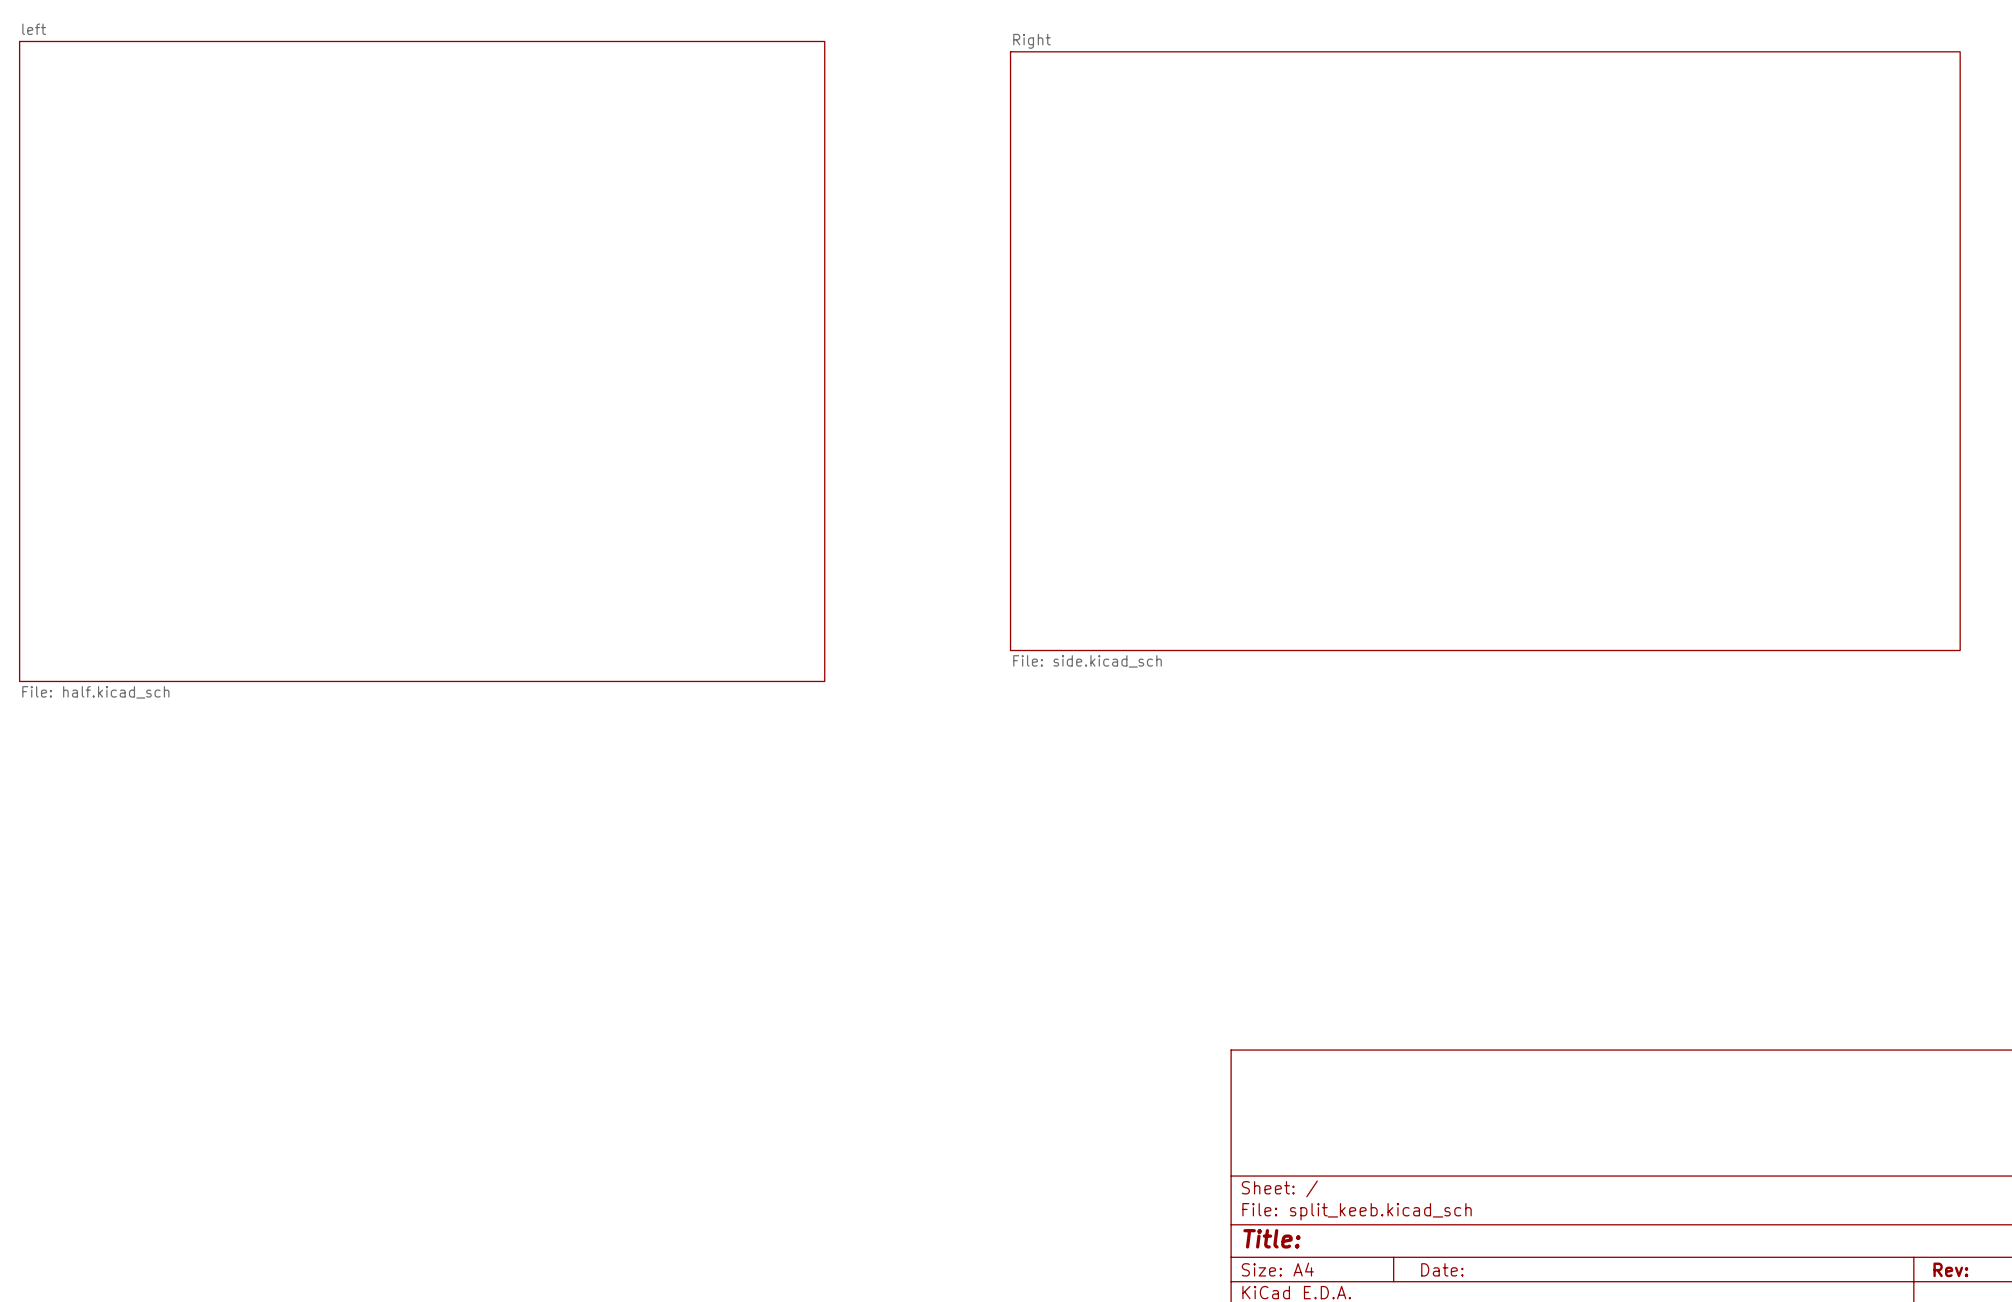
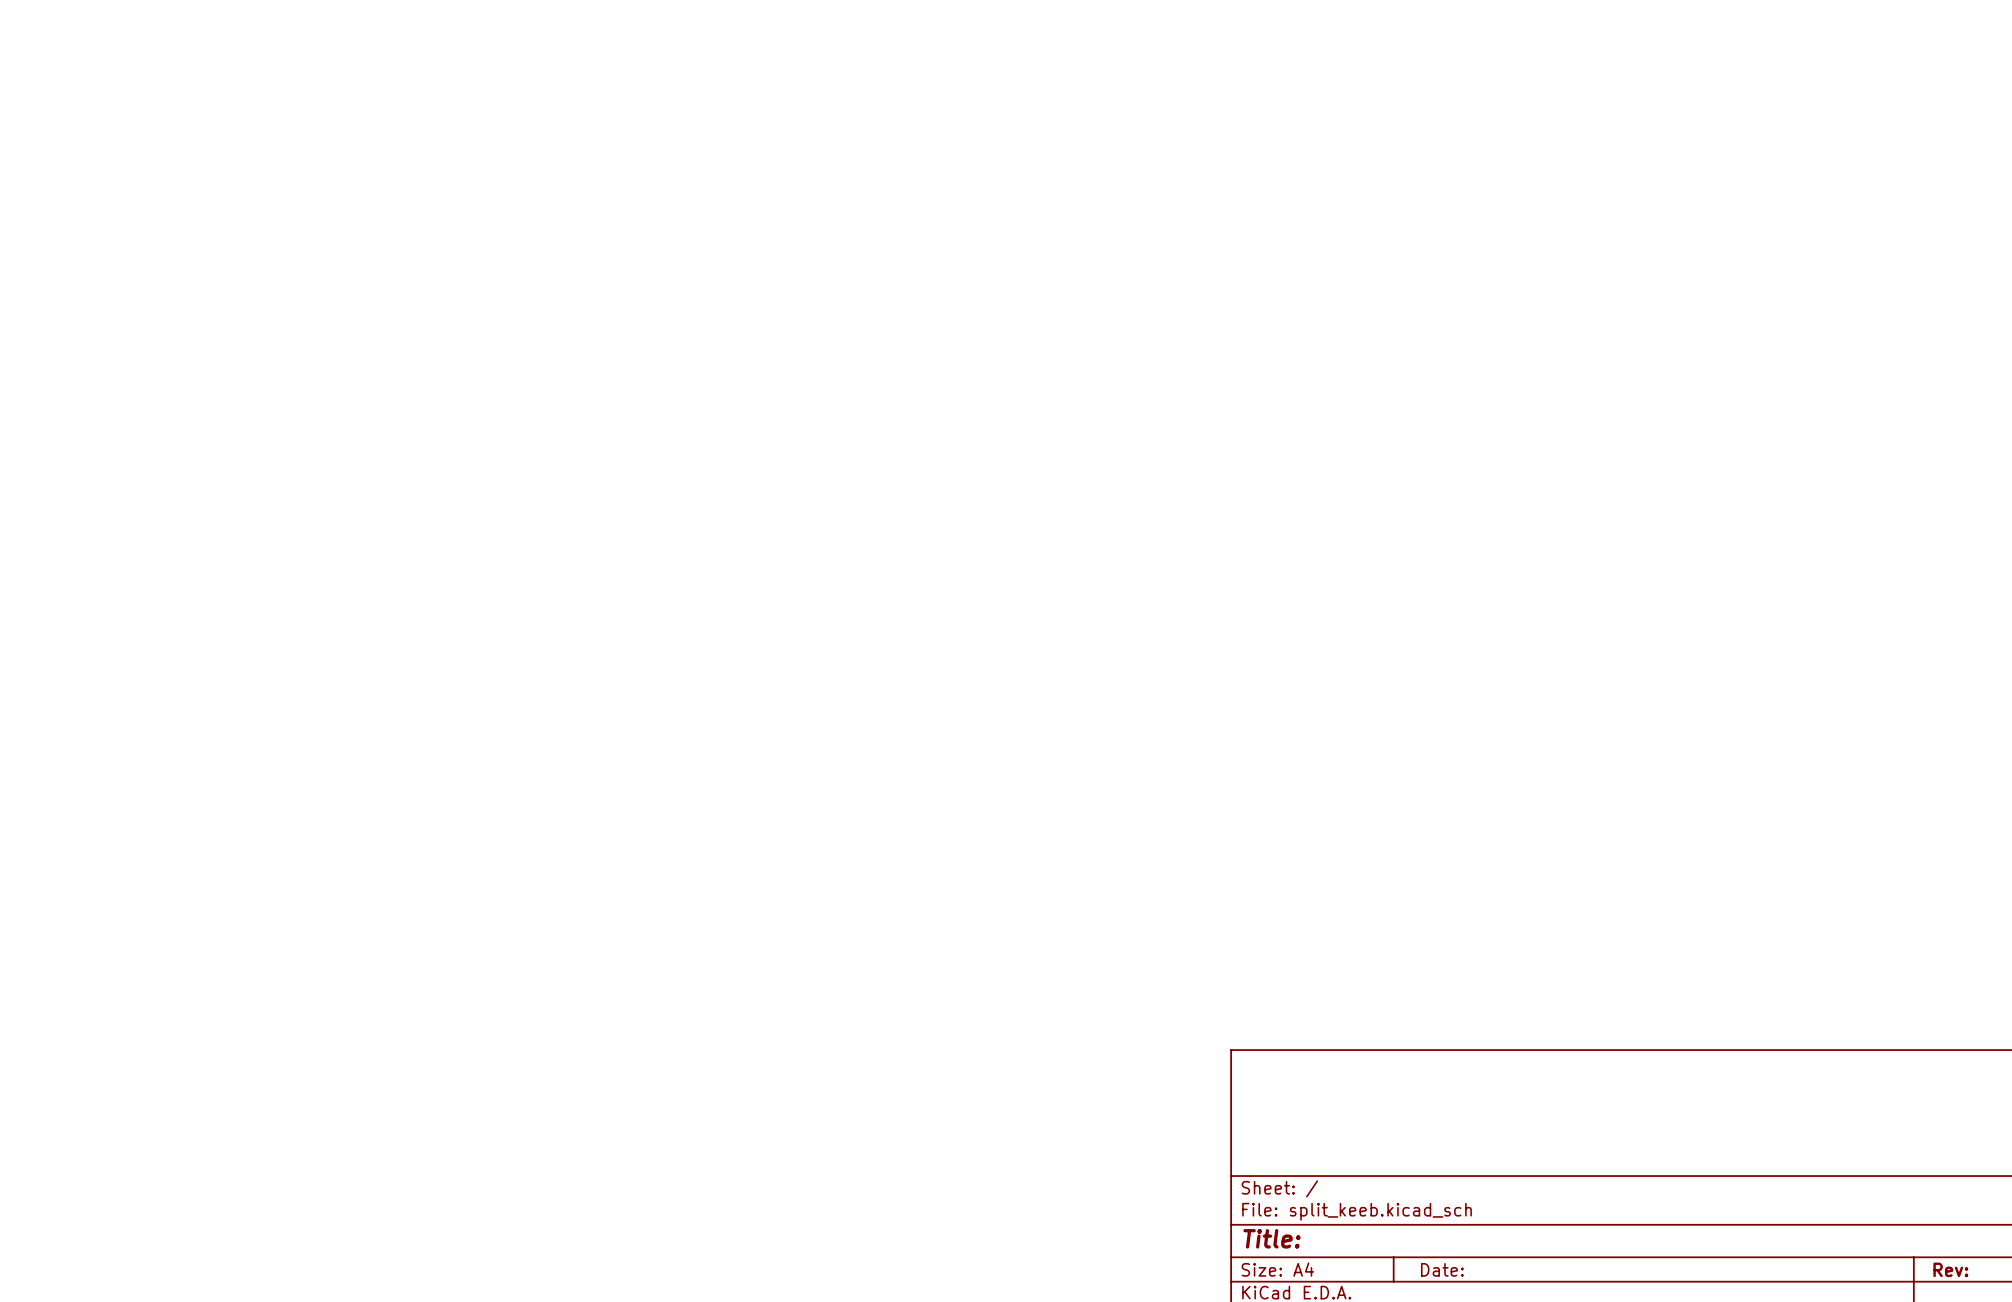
sheet Right: File: side.kicad_sch (1485, 351) -> none
sheet left: File: half.kicad_sch (422, 361) -> none

